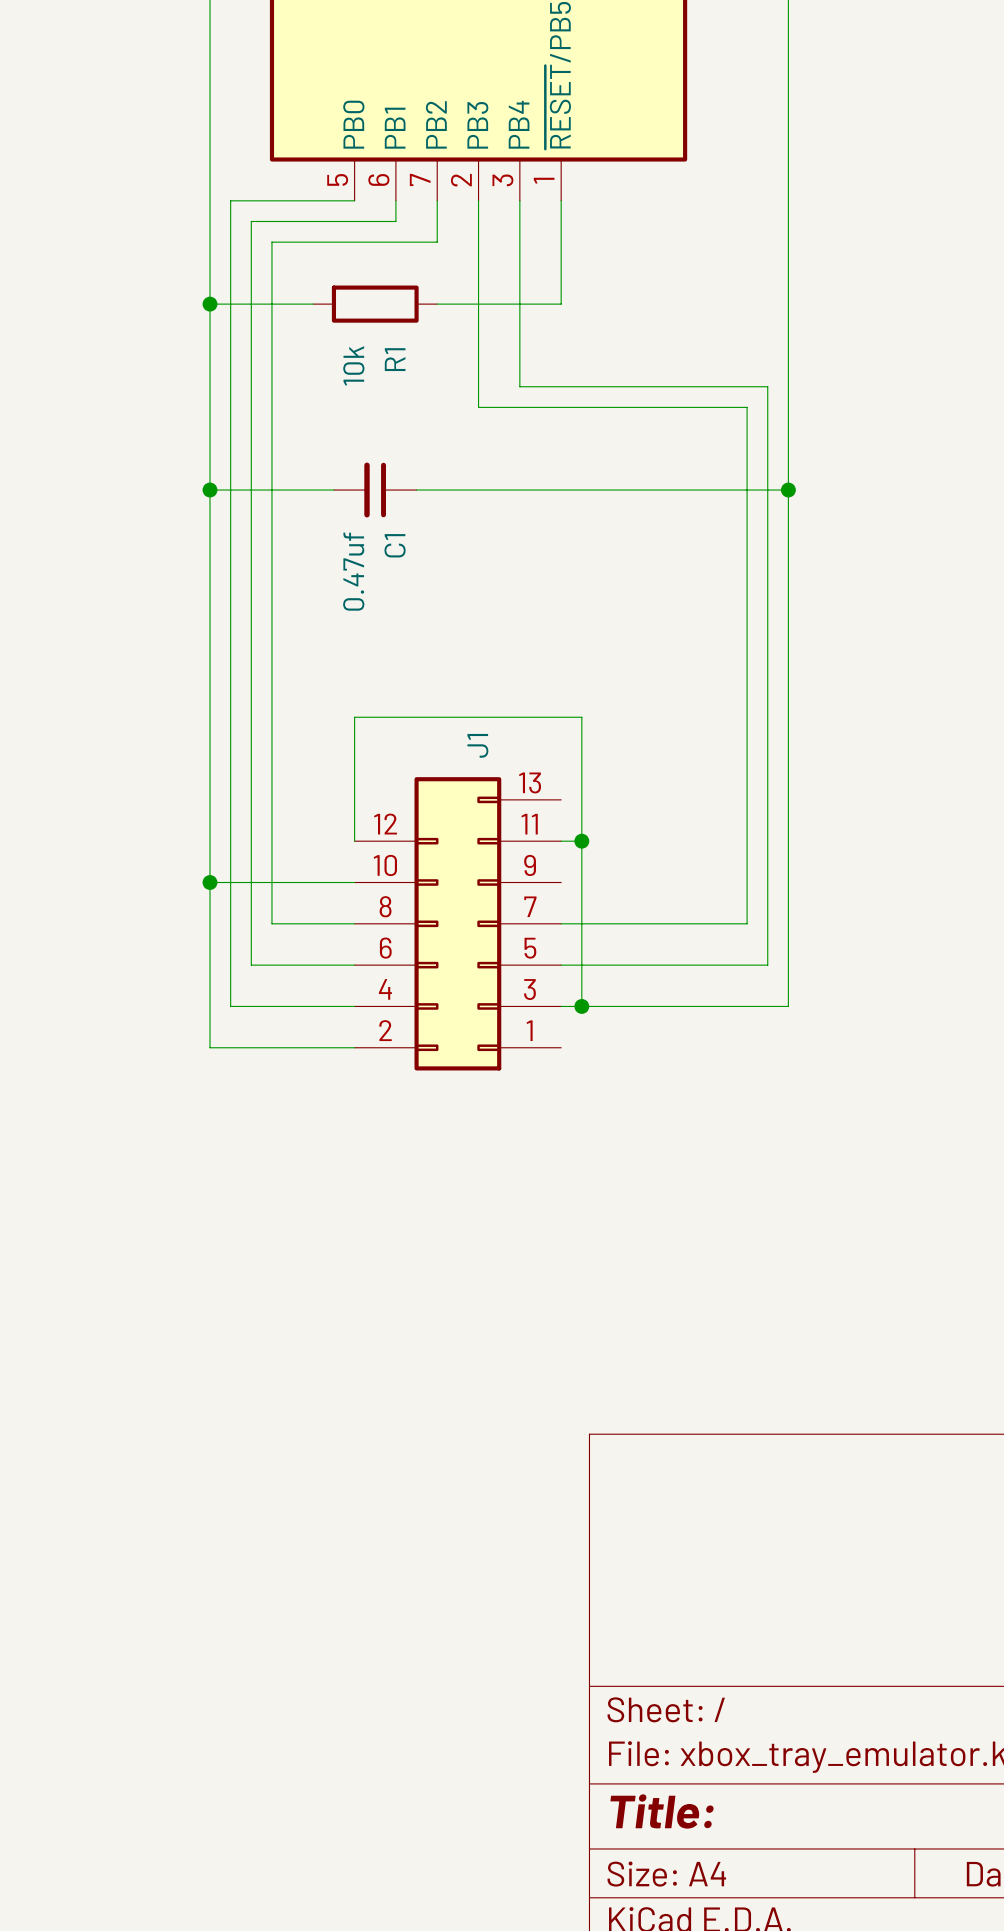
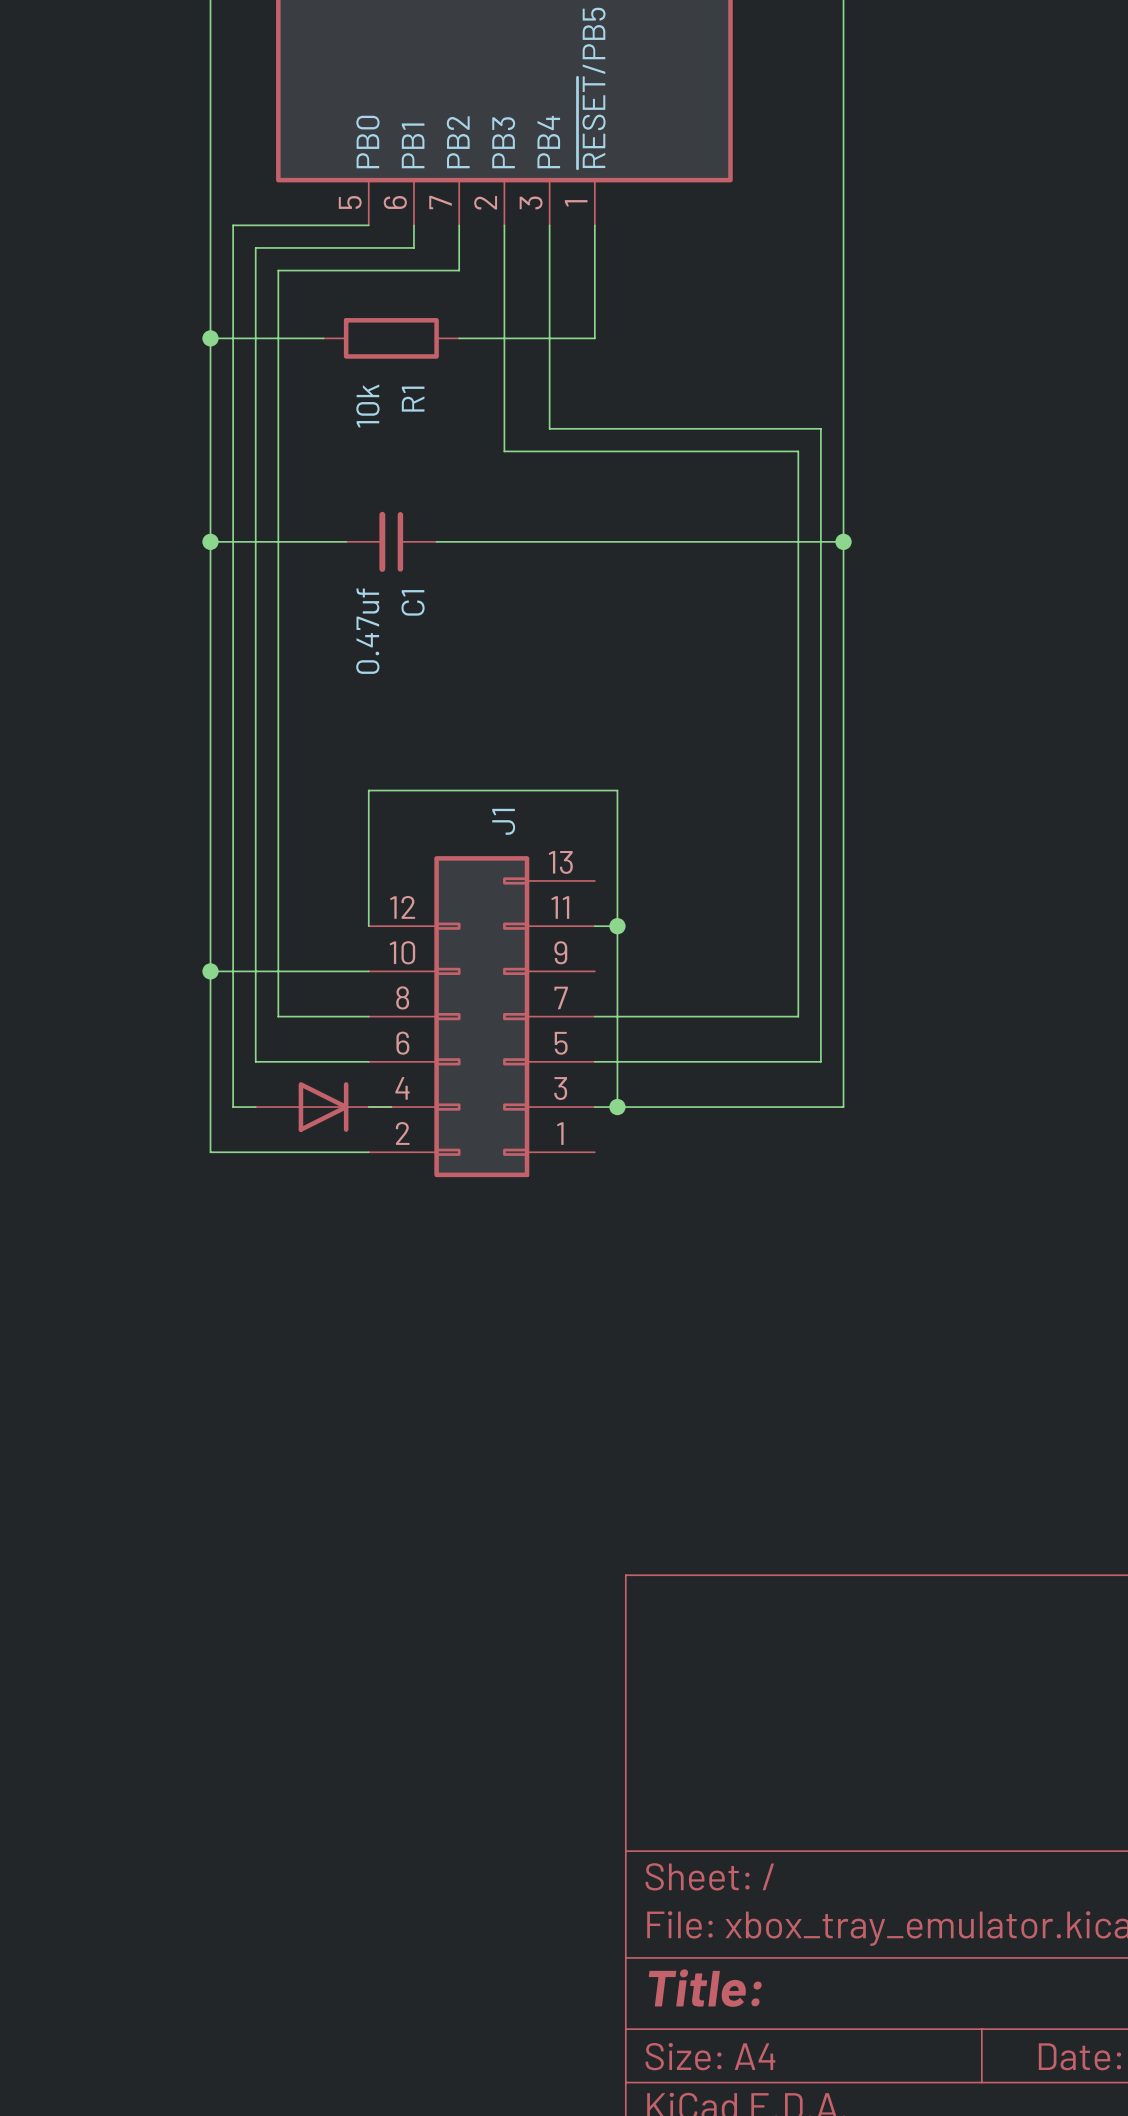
part: none -> (323, 1107)

